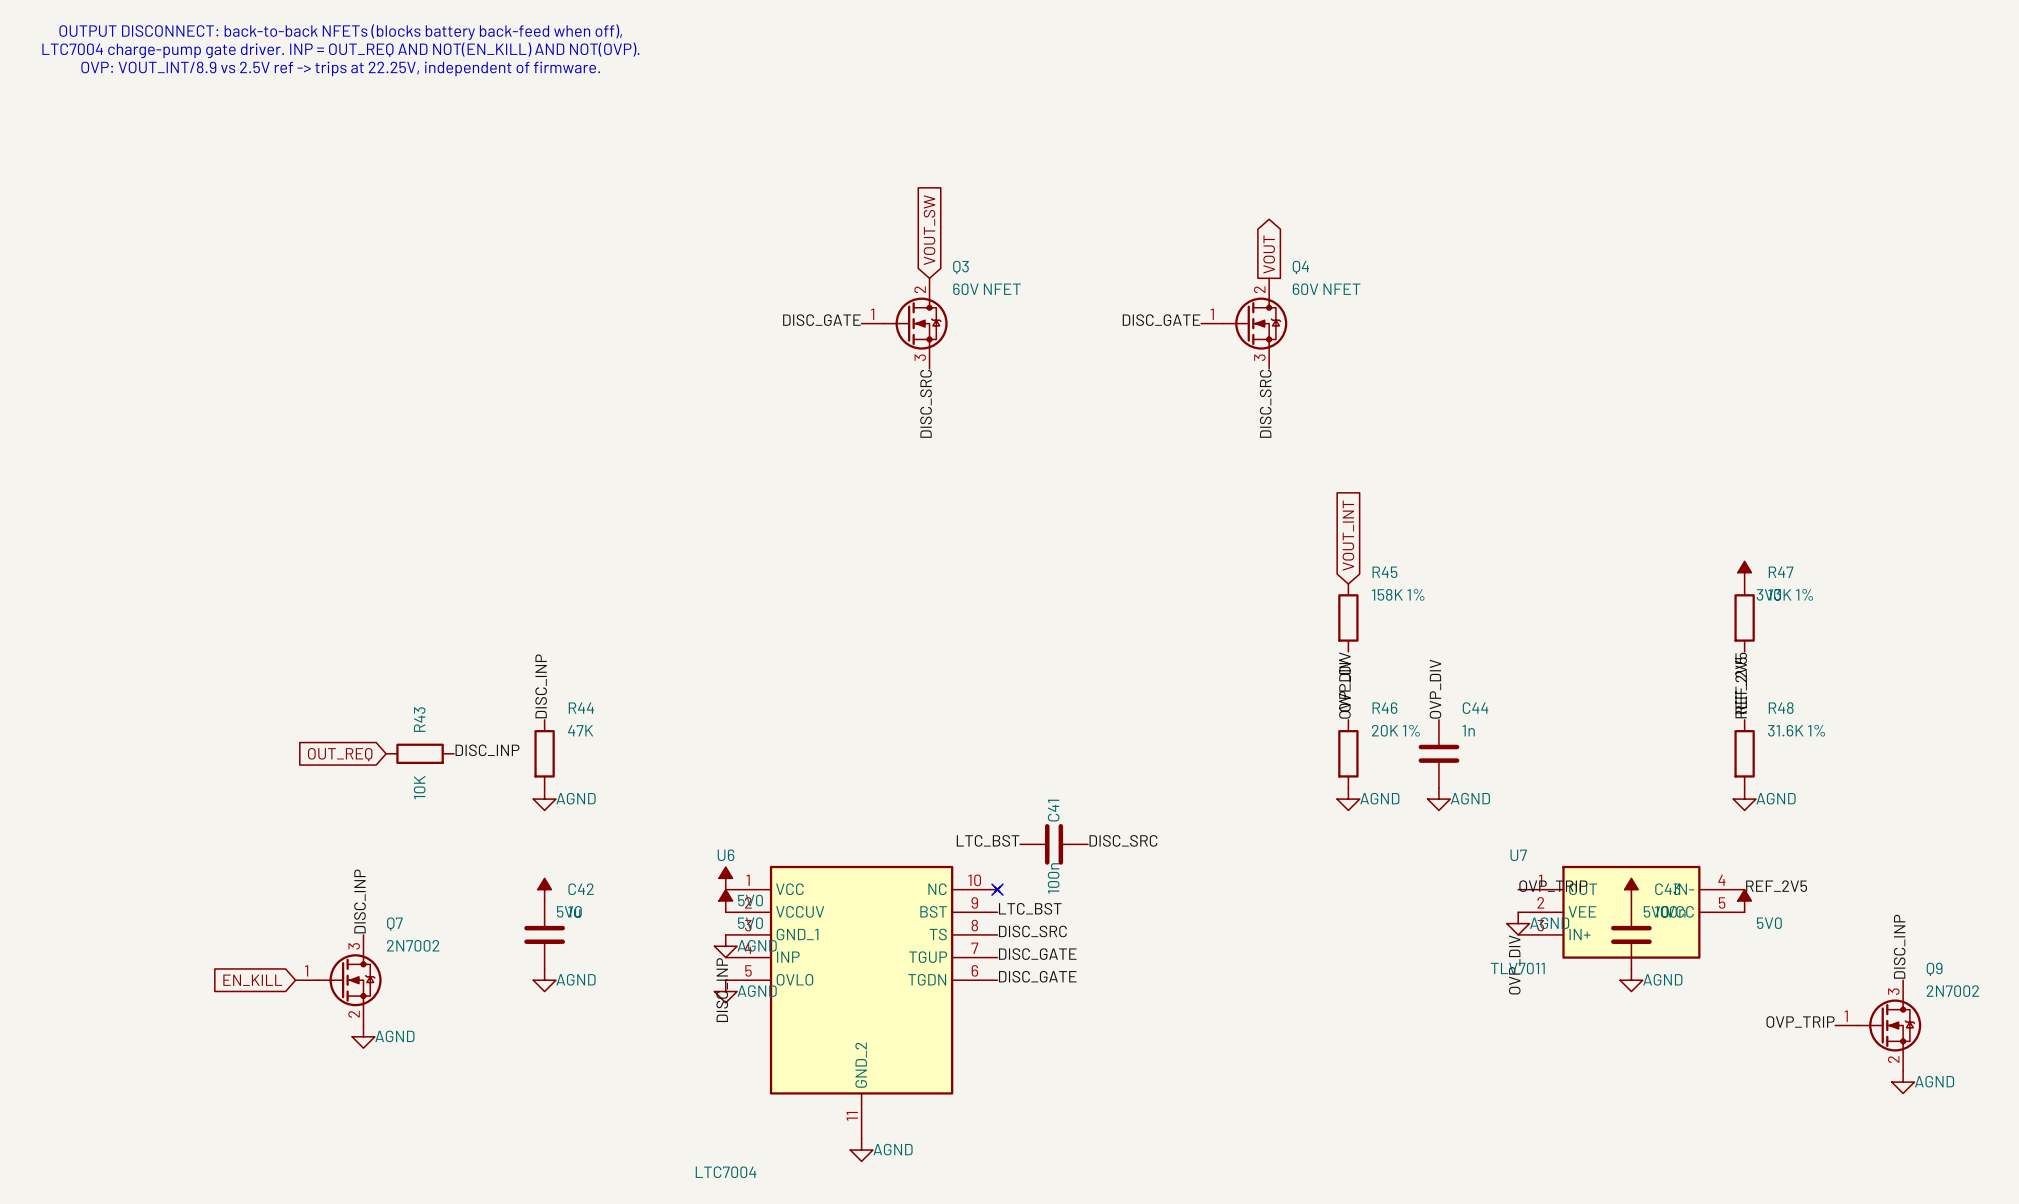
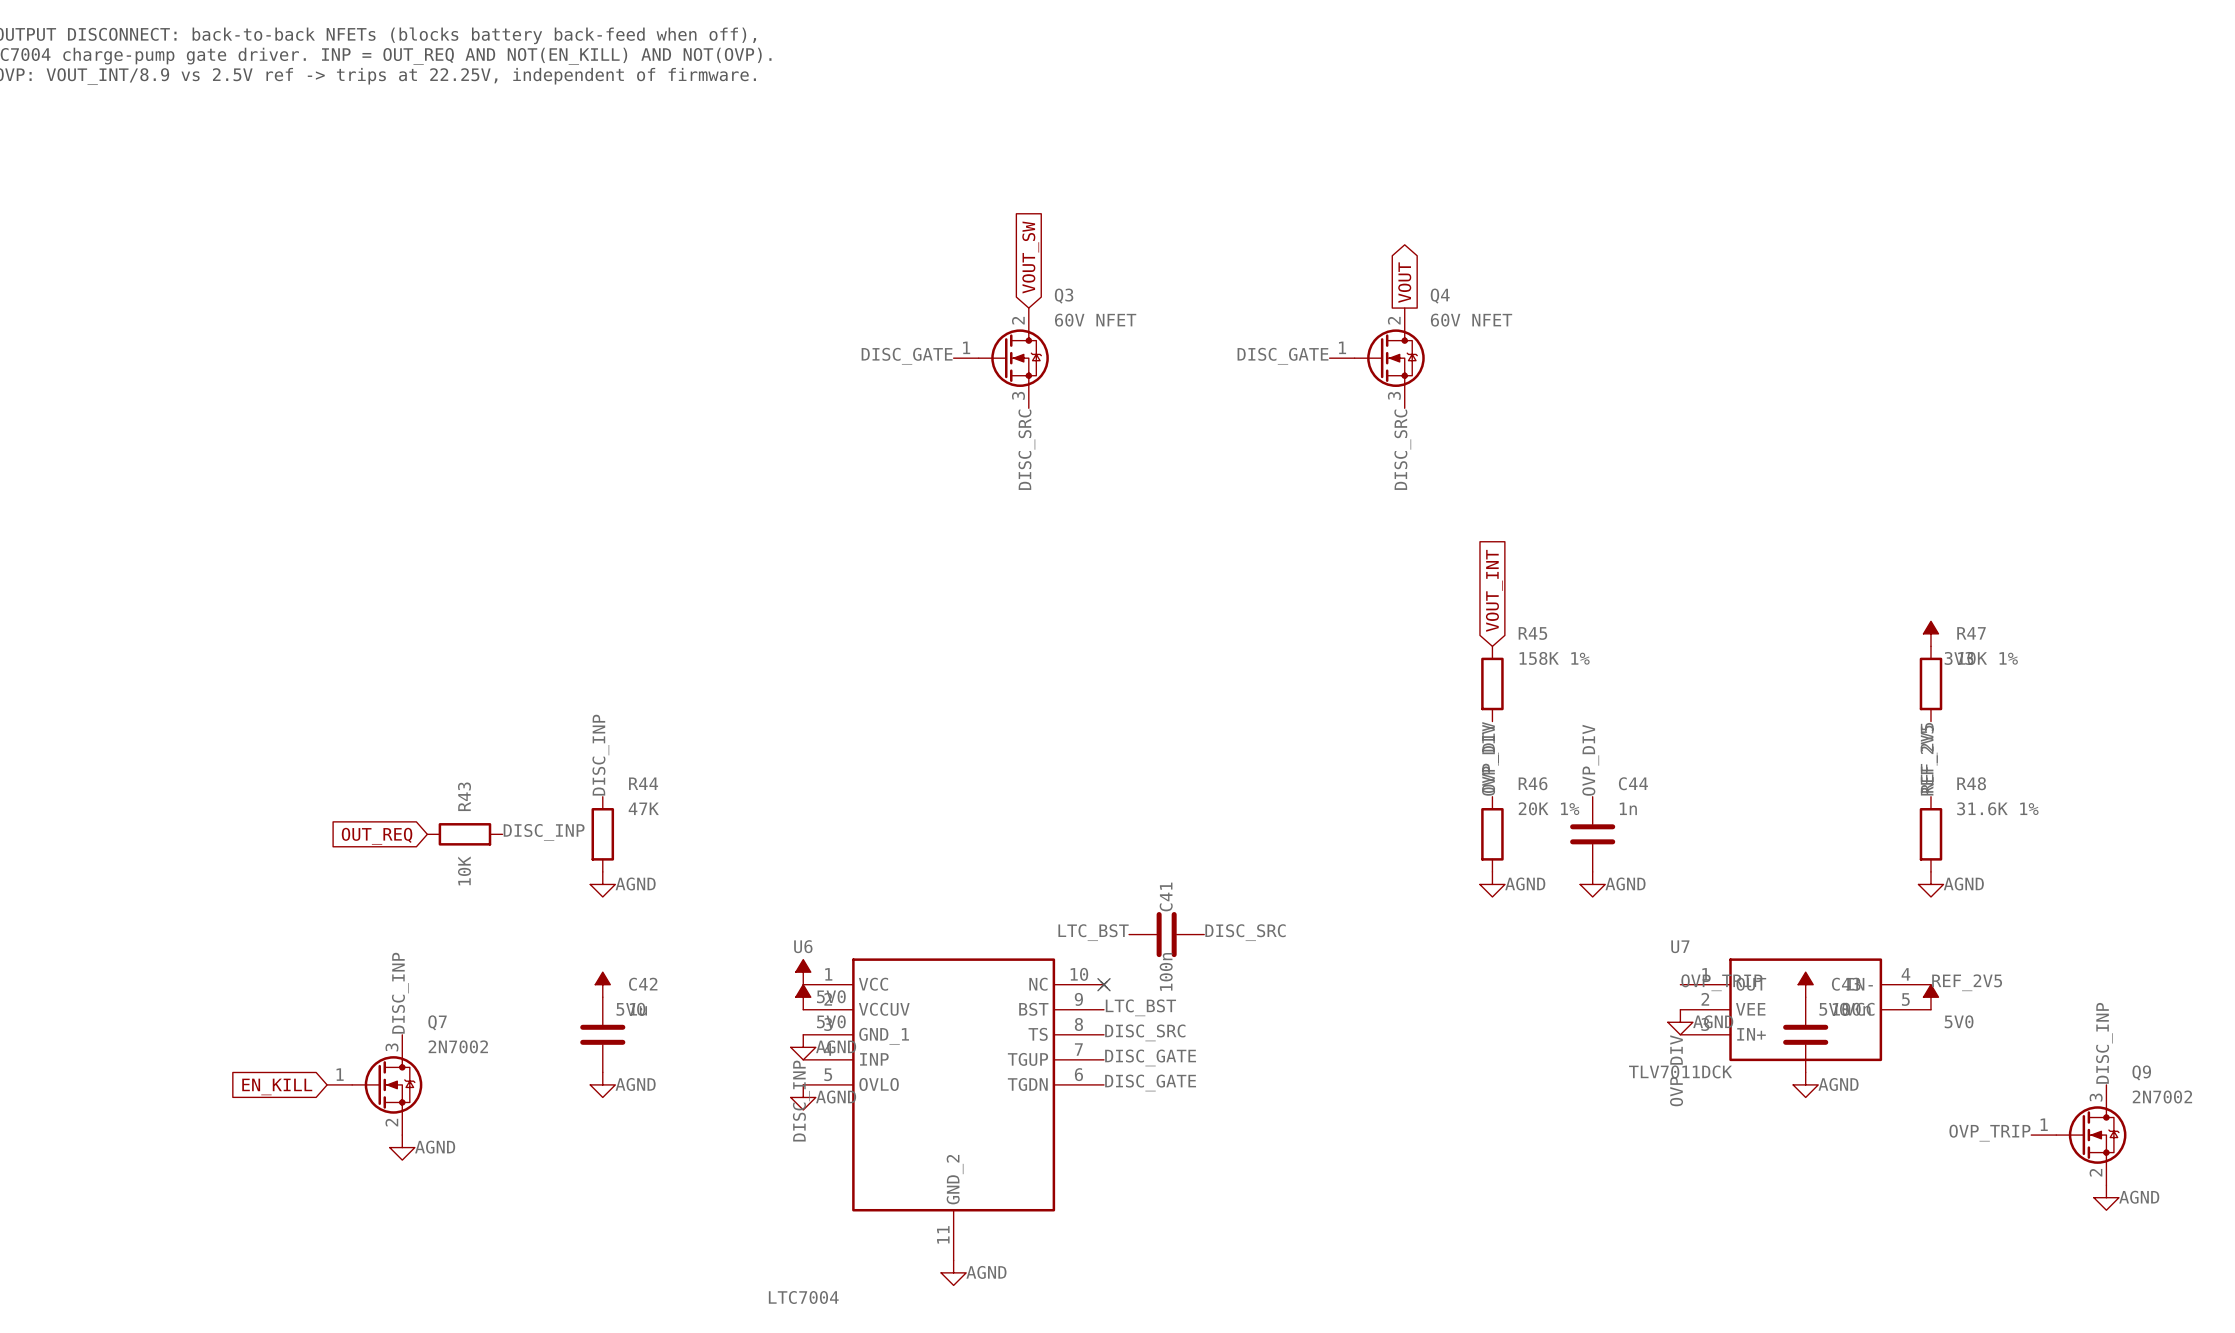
U7 value: TLV7011 (1517, 968) -> TLV7011DCK (1680, 1071)

